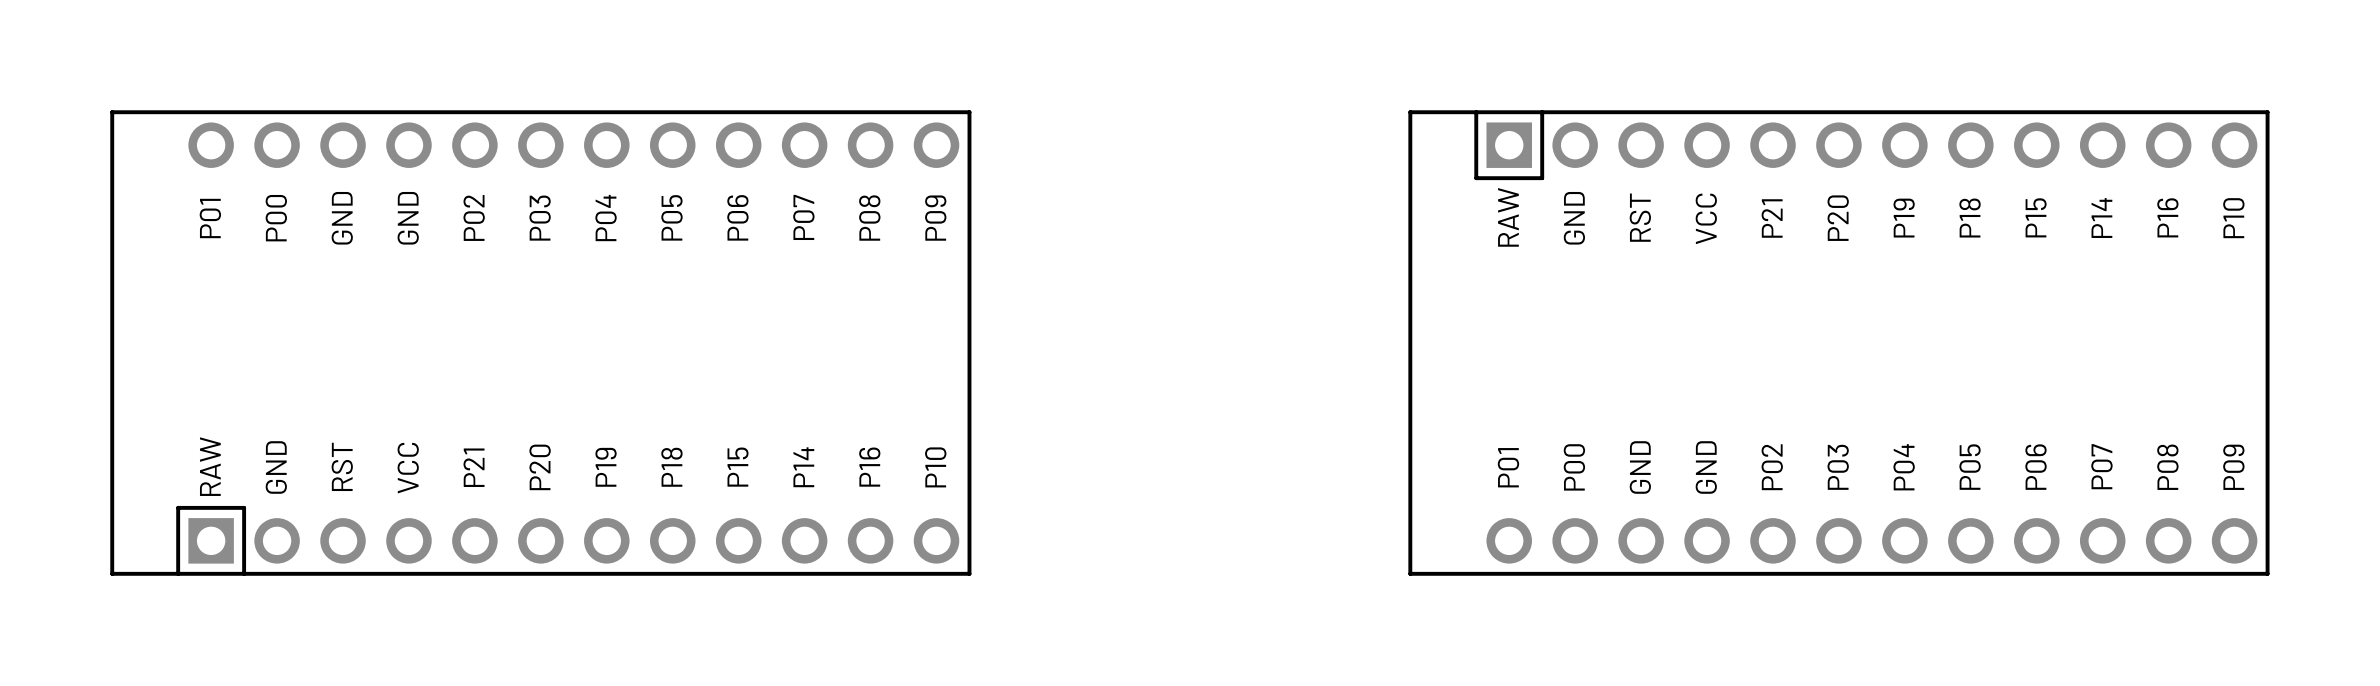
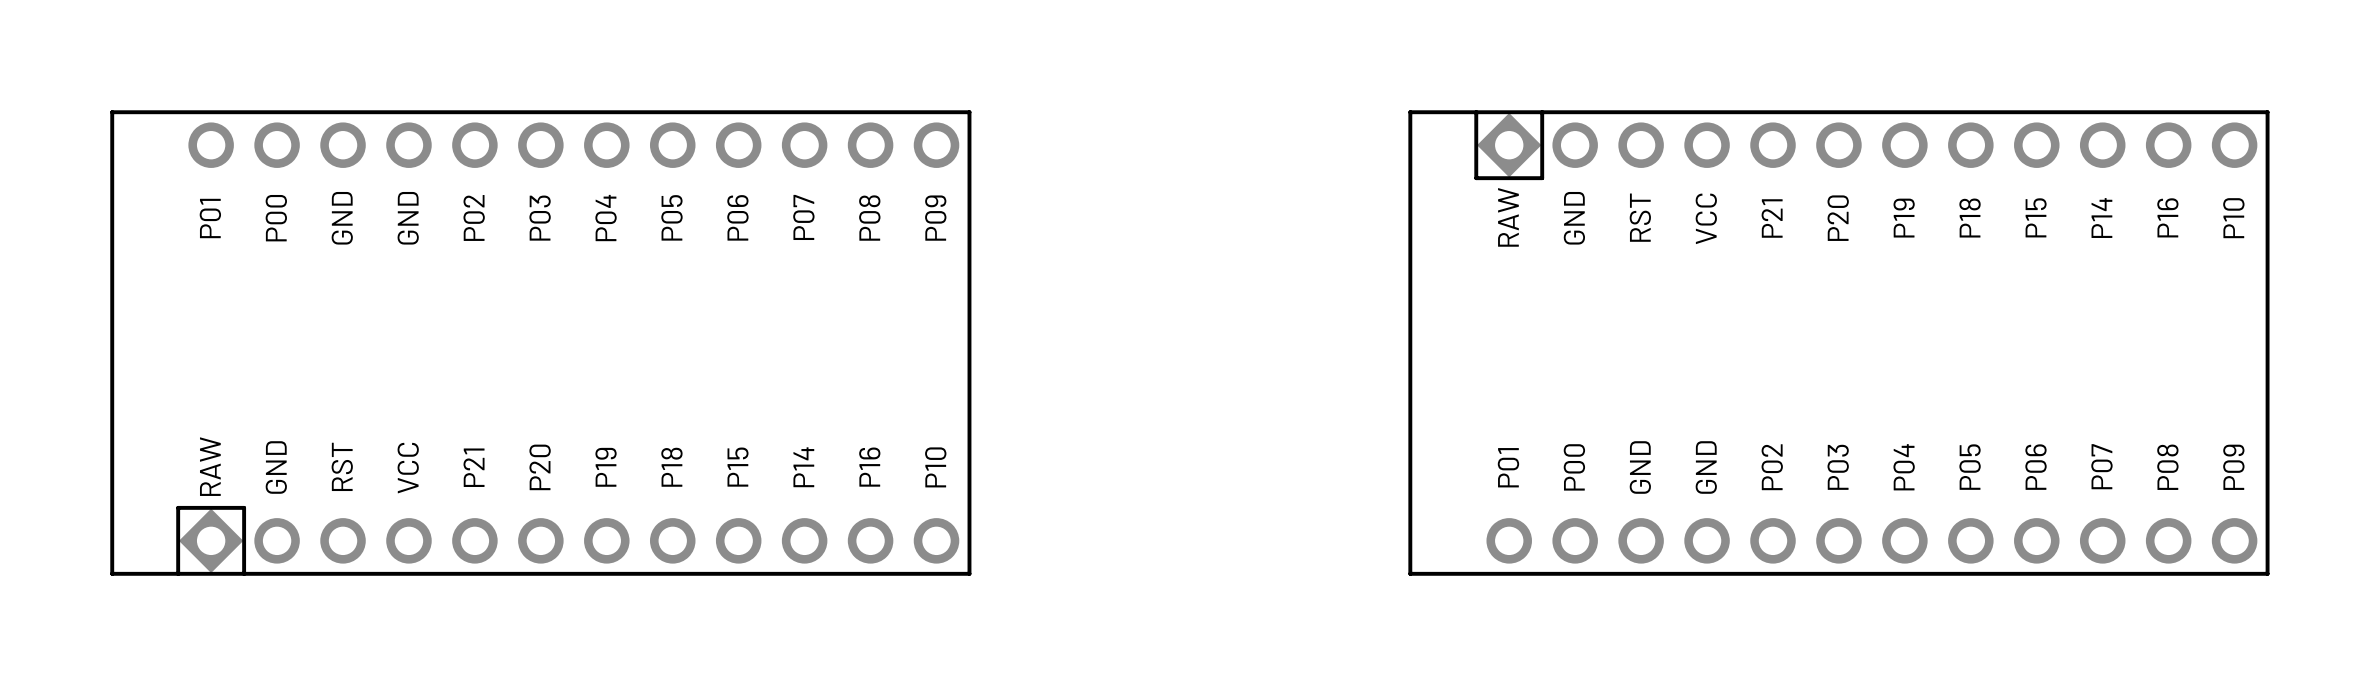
part footprint: [110, 110, 972, 576] -> [110, 110, 972, 576]
part footprint: [1408, 110, 2270, 576] -> [1408, 110, 2270, 576]

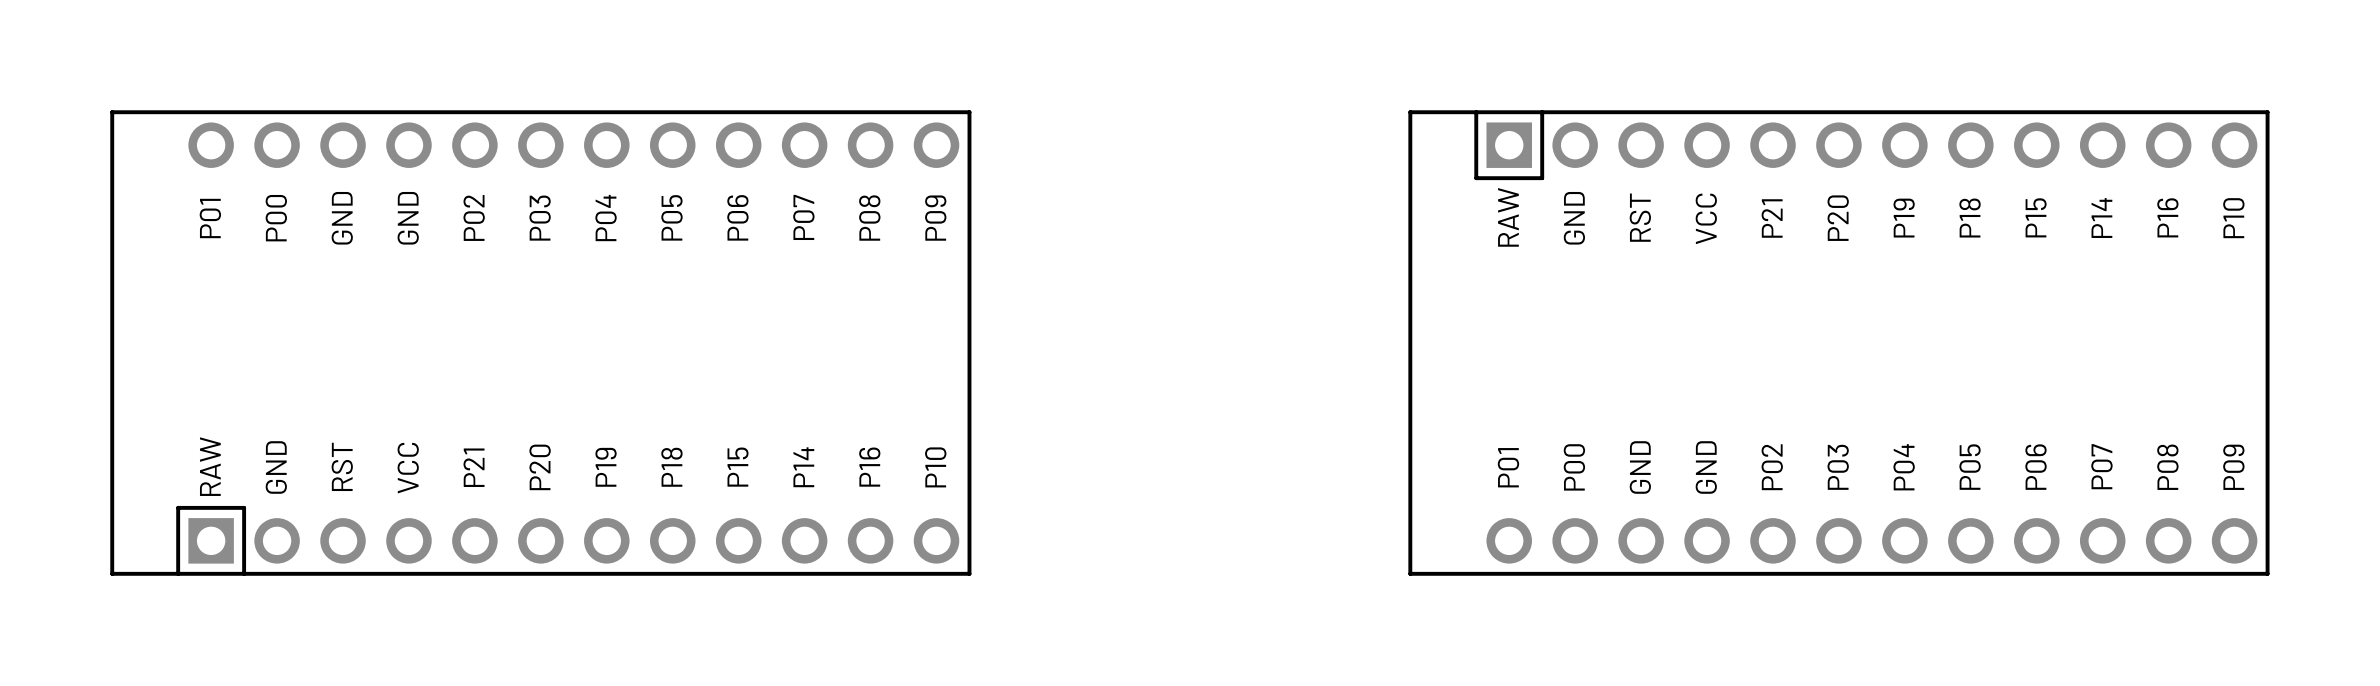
part footprint: [110, 110, 972, 576] -> [110, 110, 972, 576]
part footprint: [1408, 110, 2270, 576] -> [1408, 110, 2270, 576]

